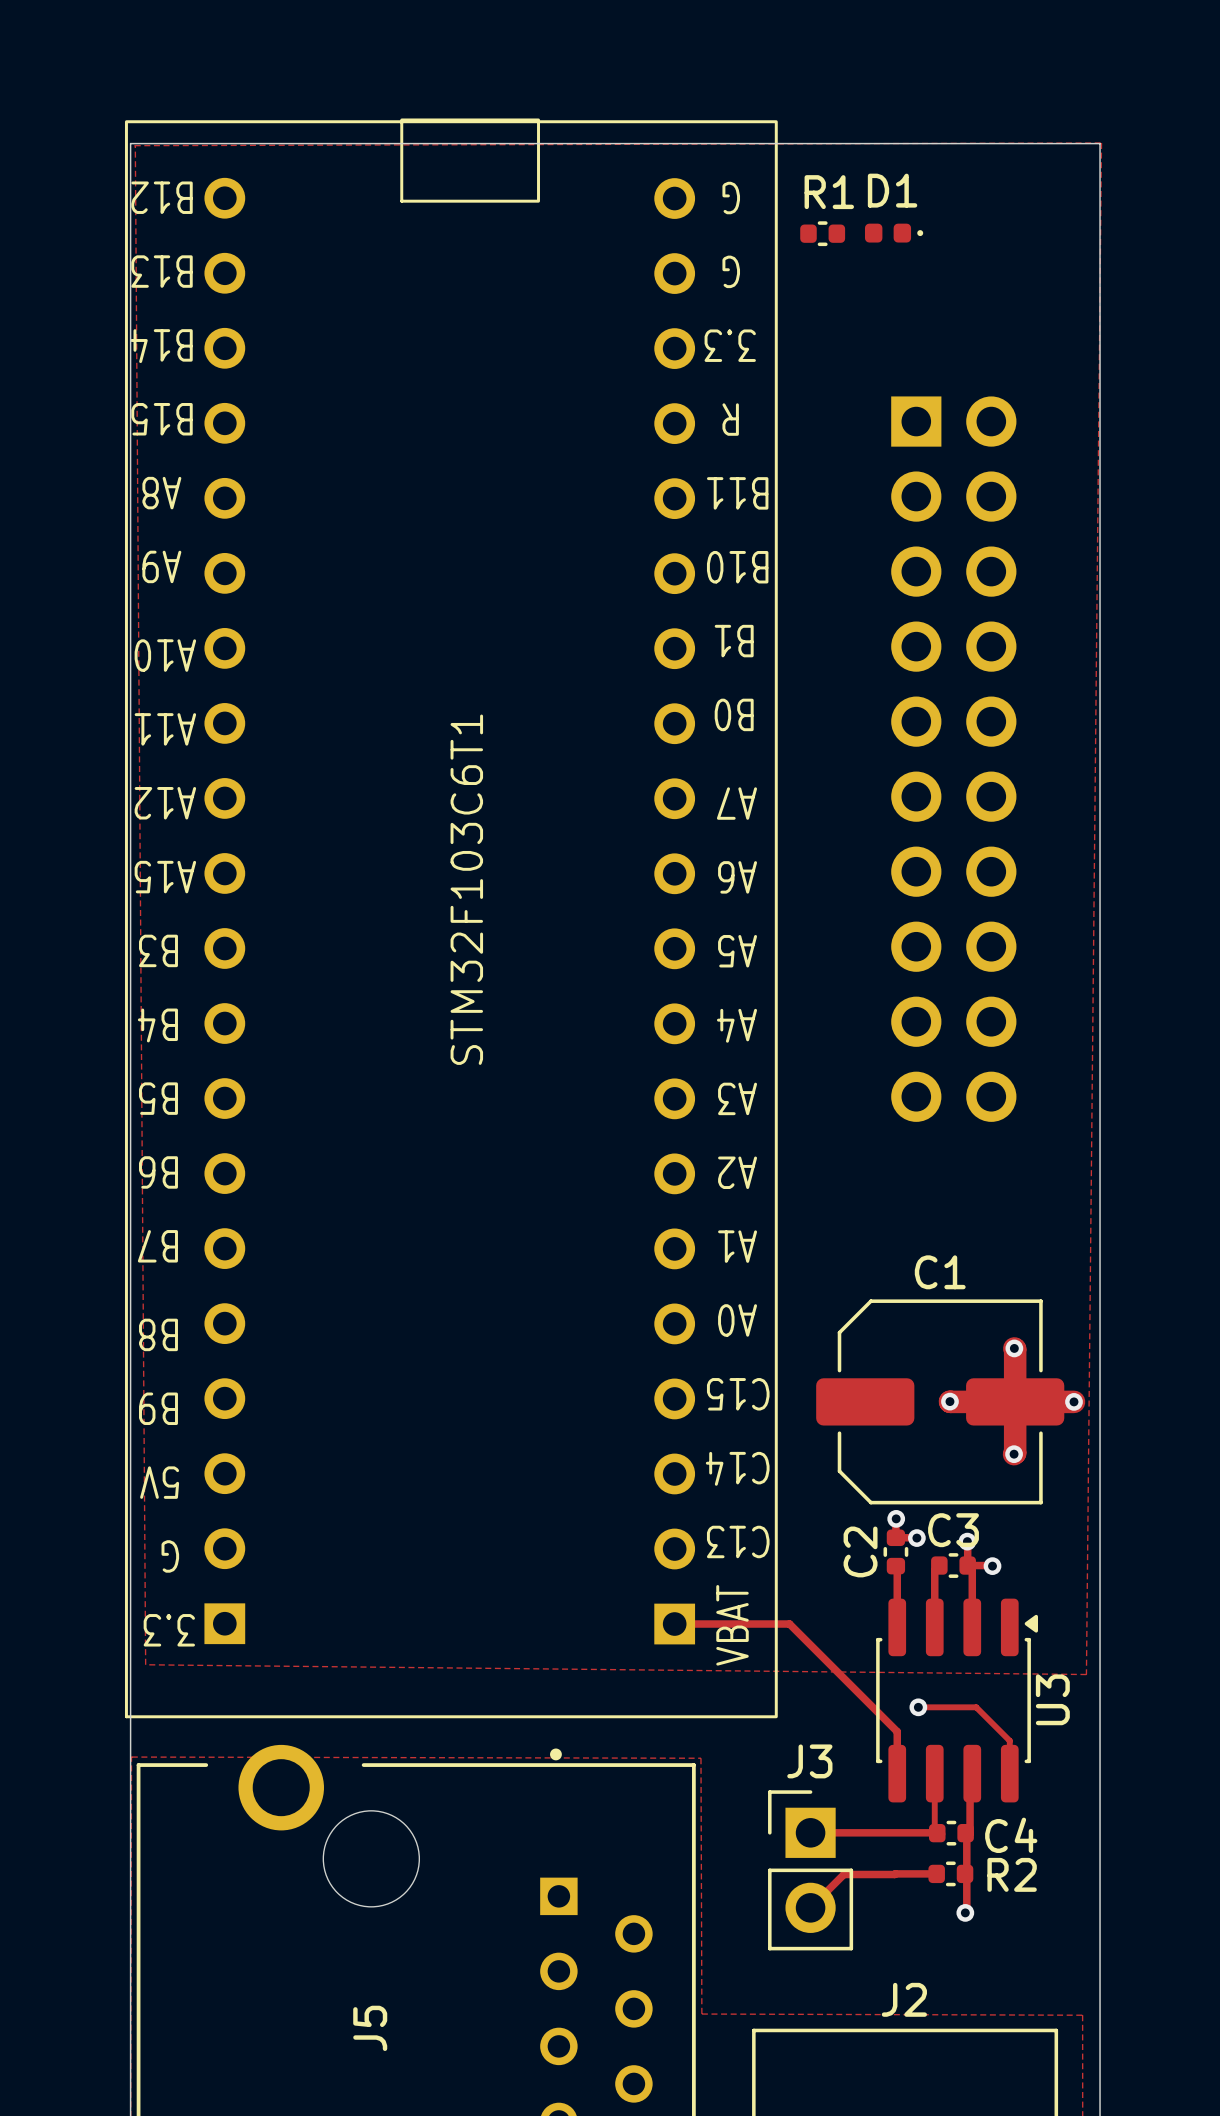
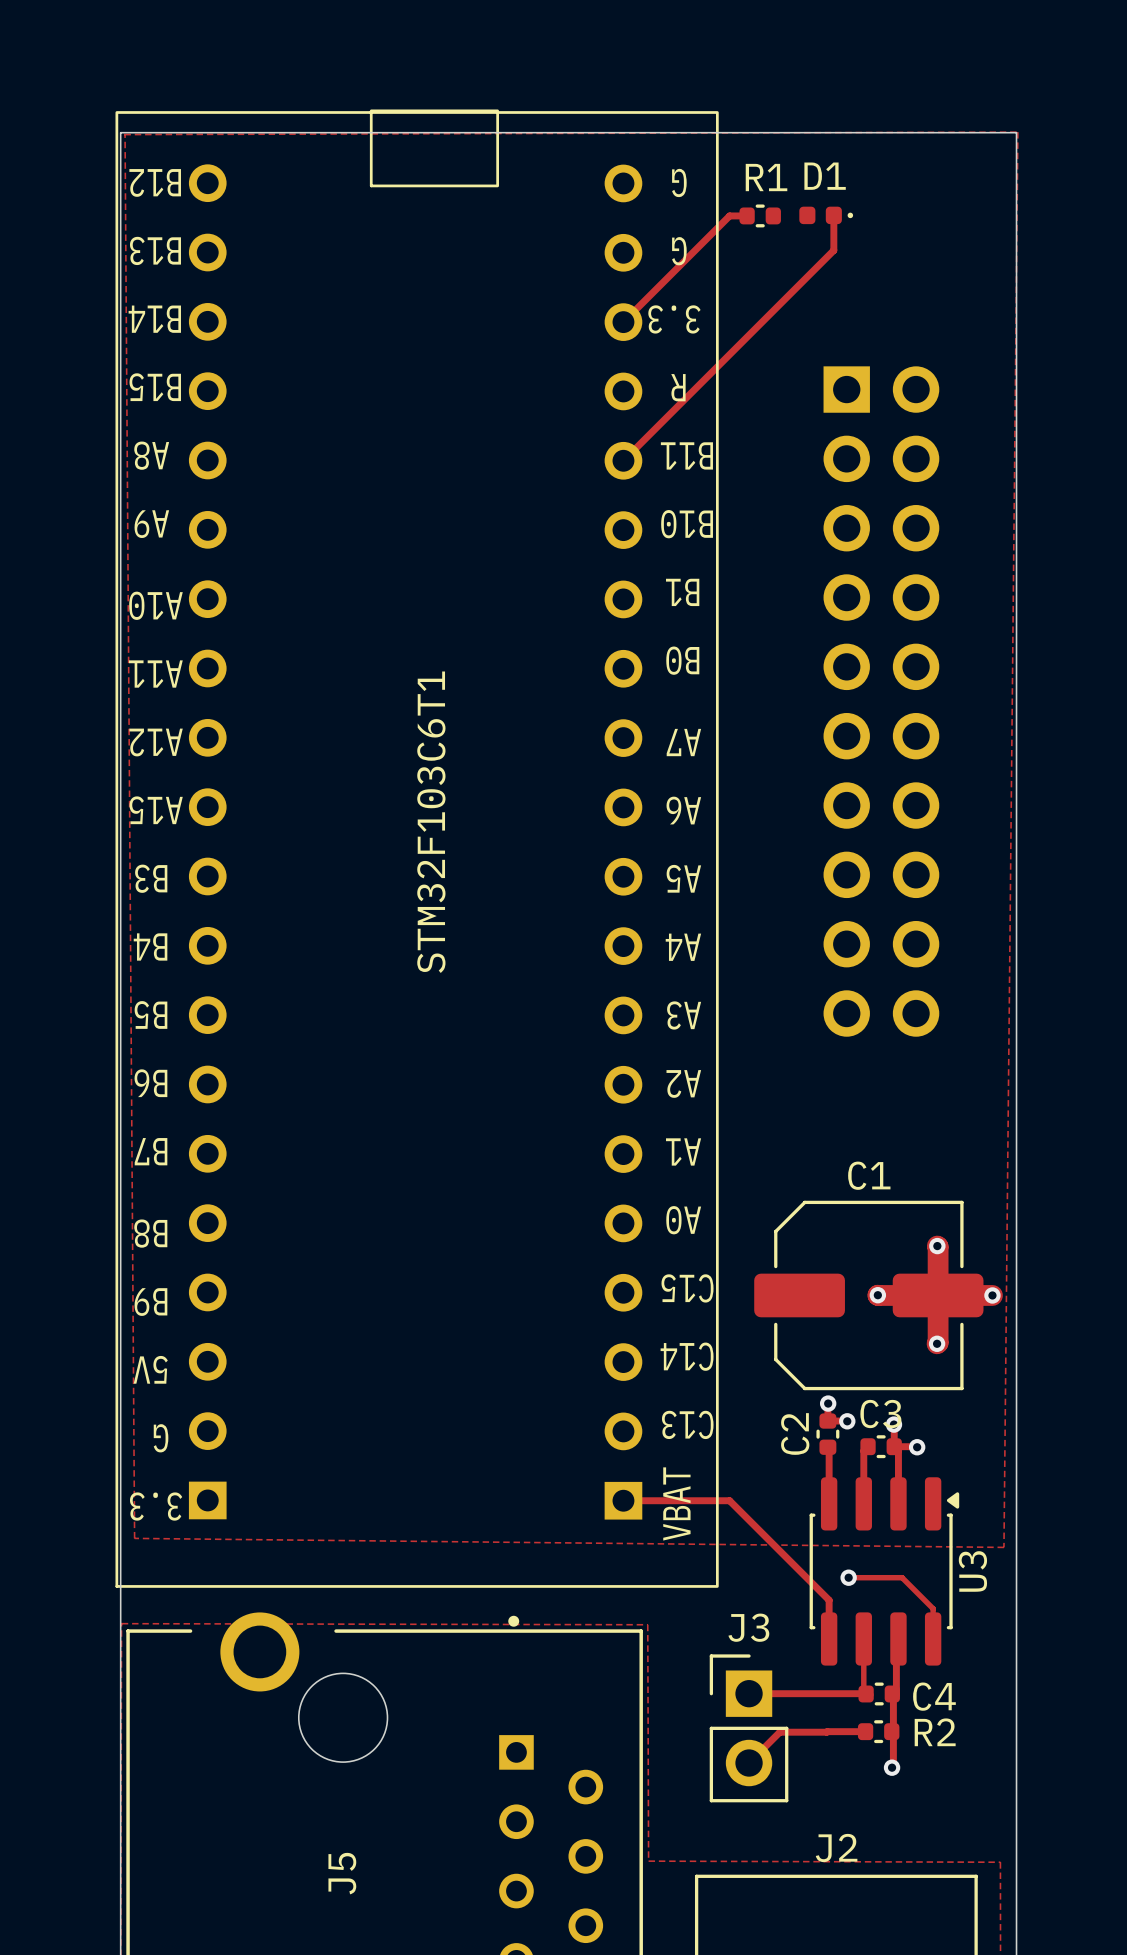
track: none -> (747, 215) (729, 215) (623, 322)
track: none -> (833, 215) (833, 250) (623, 460)

